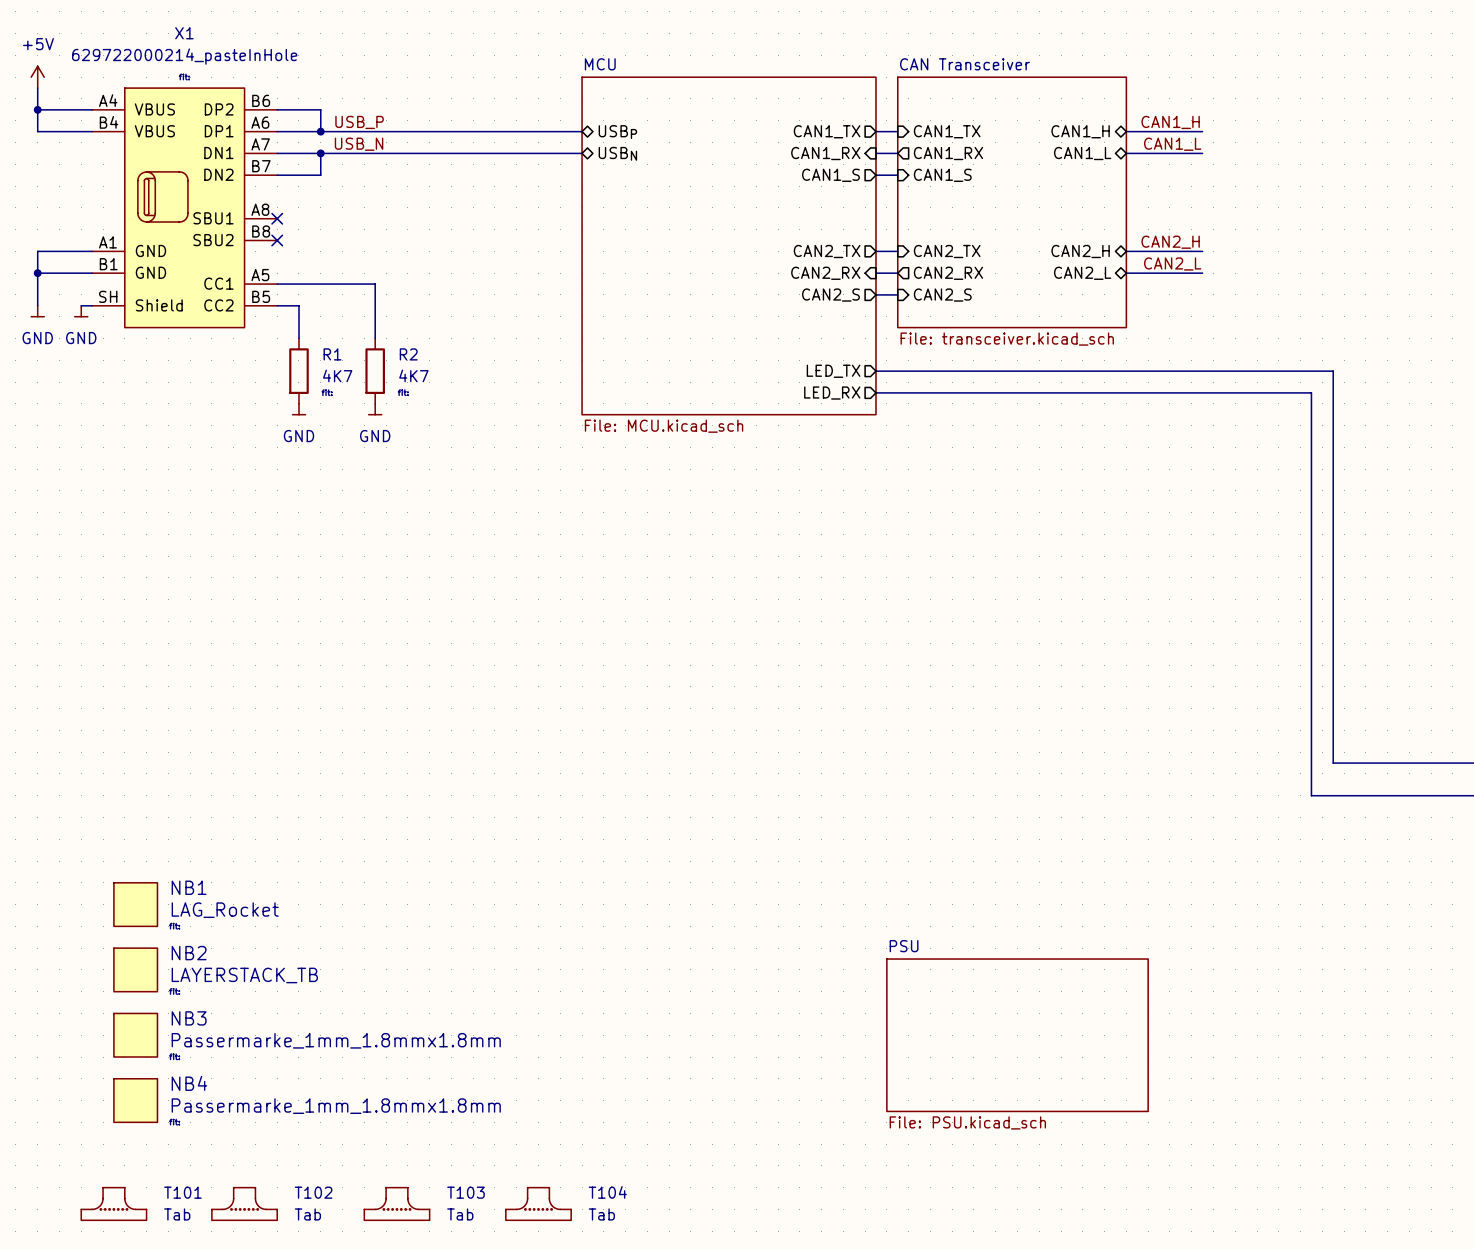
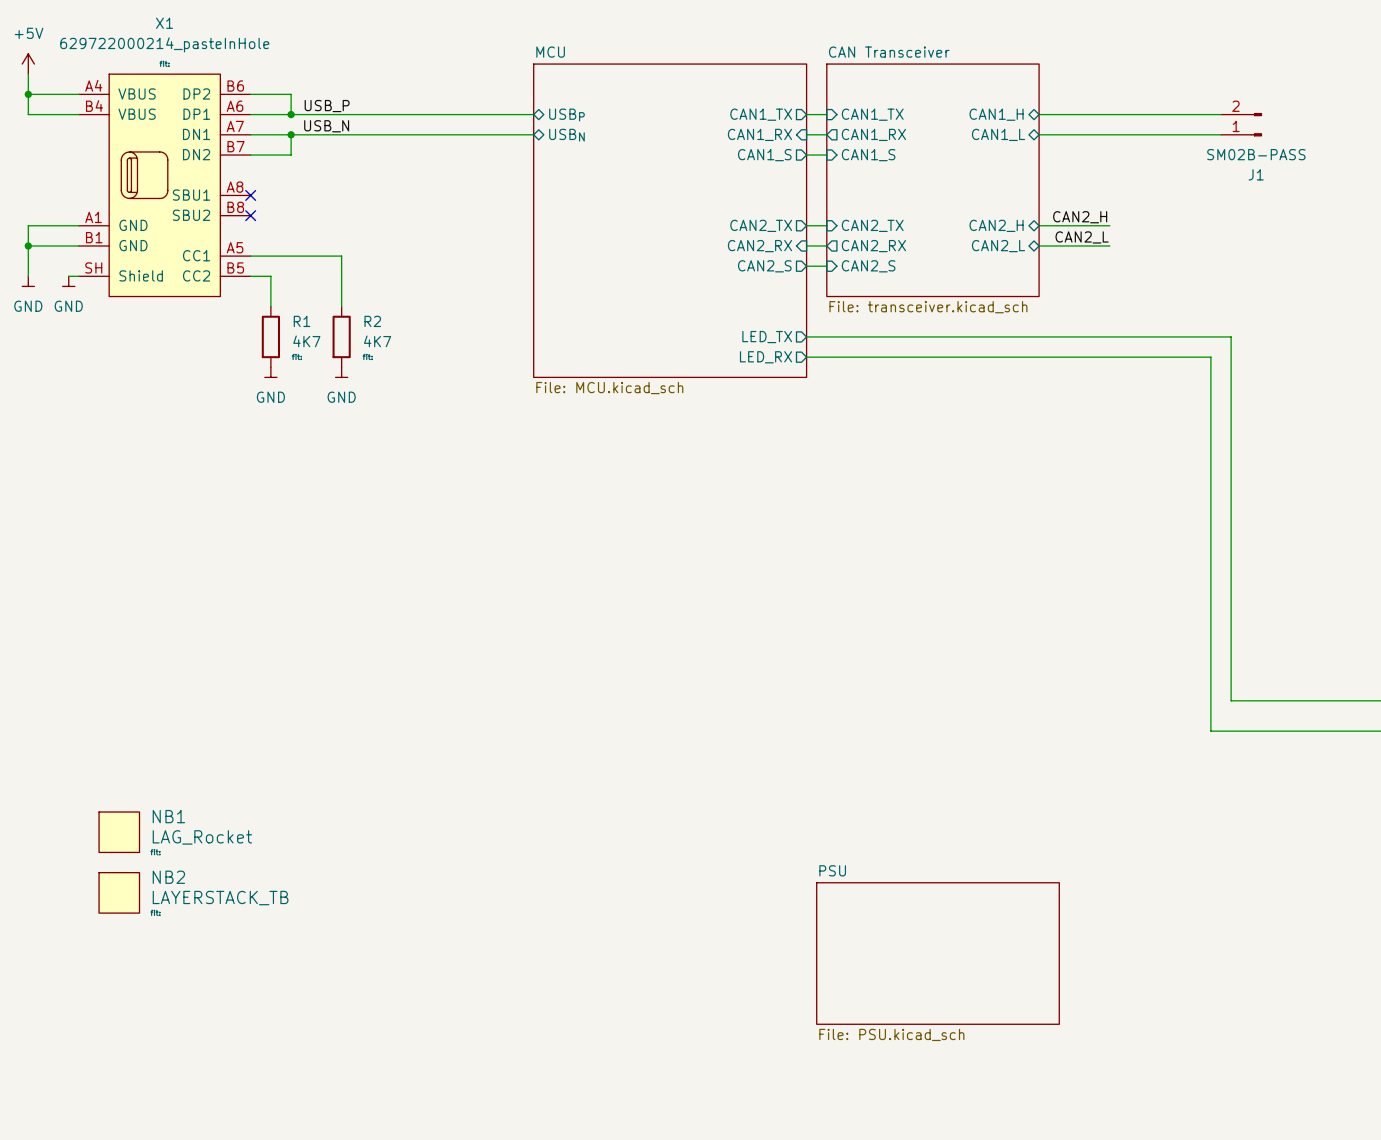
label: CAN1_H (1170, 122) -> none
wire: none -> (1109, 114) (1221, 114)
J1: none -> SM02B-PASS (1241, 124)
label: CAN1_L (1172, 144) -> none
wire: none -> (1109, 134) (1221, 134)
NB3: Passermarke_1mm_1.8mmx1.8mm (135, 1035) -> none
NB4: Passermarke_1mm_1.8mmx1.8mm (135, 1100) -> none
T101: Tab (113, 1203) -> none
T102: Tab (244, 1203) -> none
T103: Tab (396, 1203) -> none
T104: Tab (538, 1203) -> none

